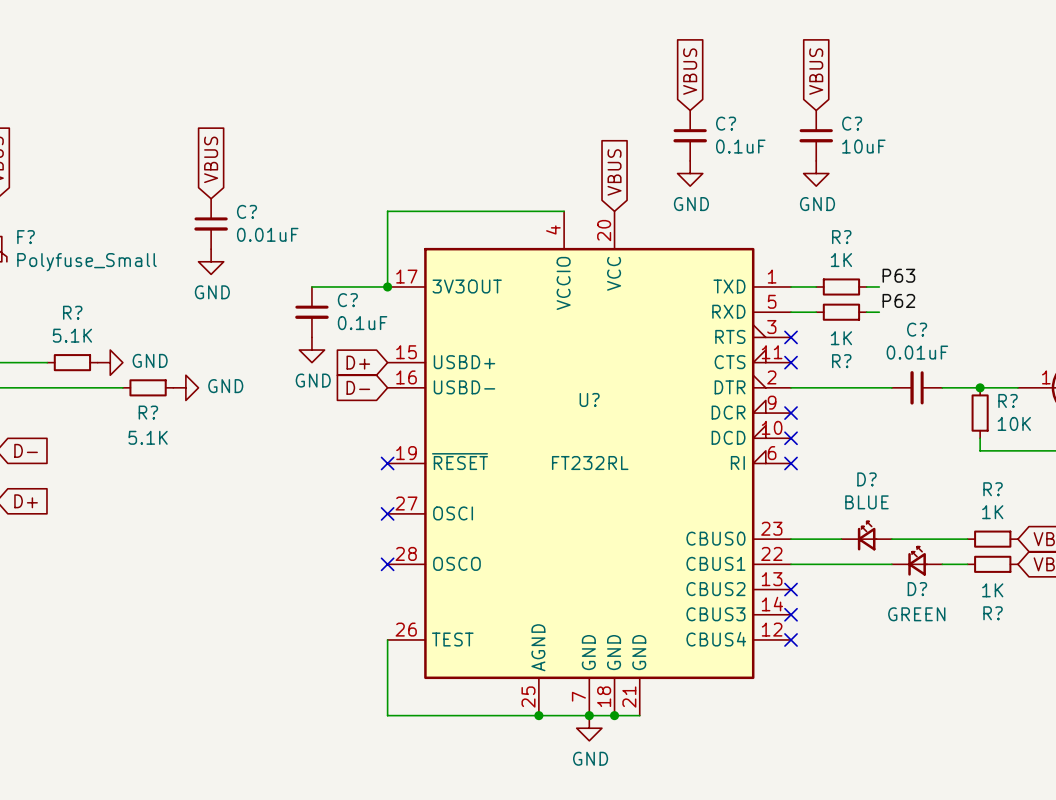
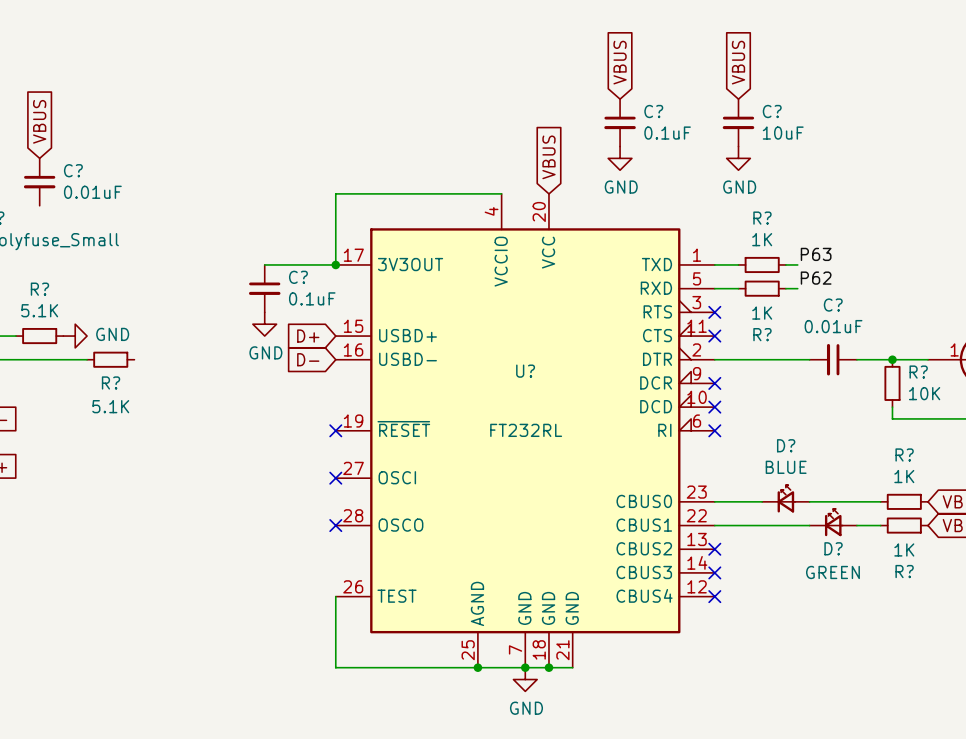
global label position: VBUS (211, 159) -> VBUS (39, 121)
C? position: (211, 223) -> (39, 182)
power symbol: GND (211, 261) -> none
power symbol: GND (185, 387) -> none

